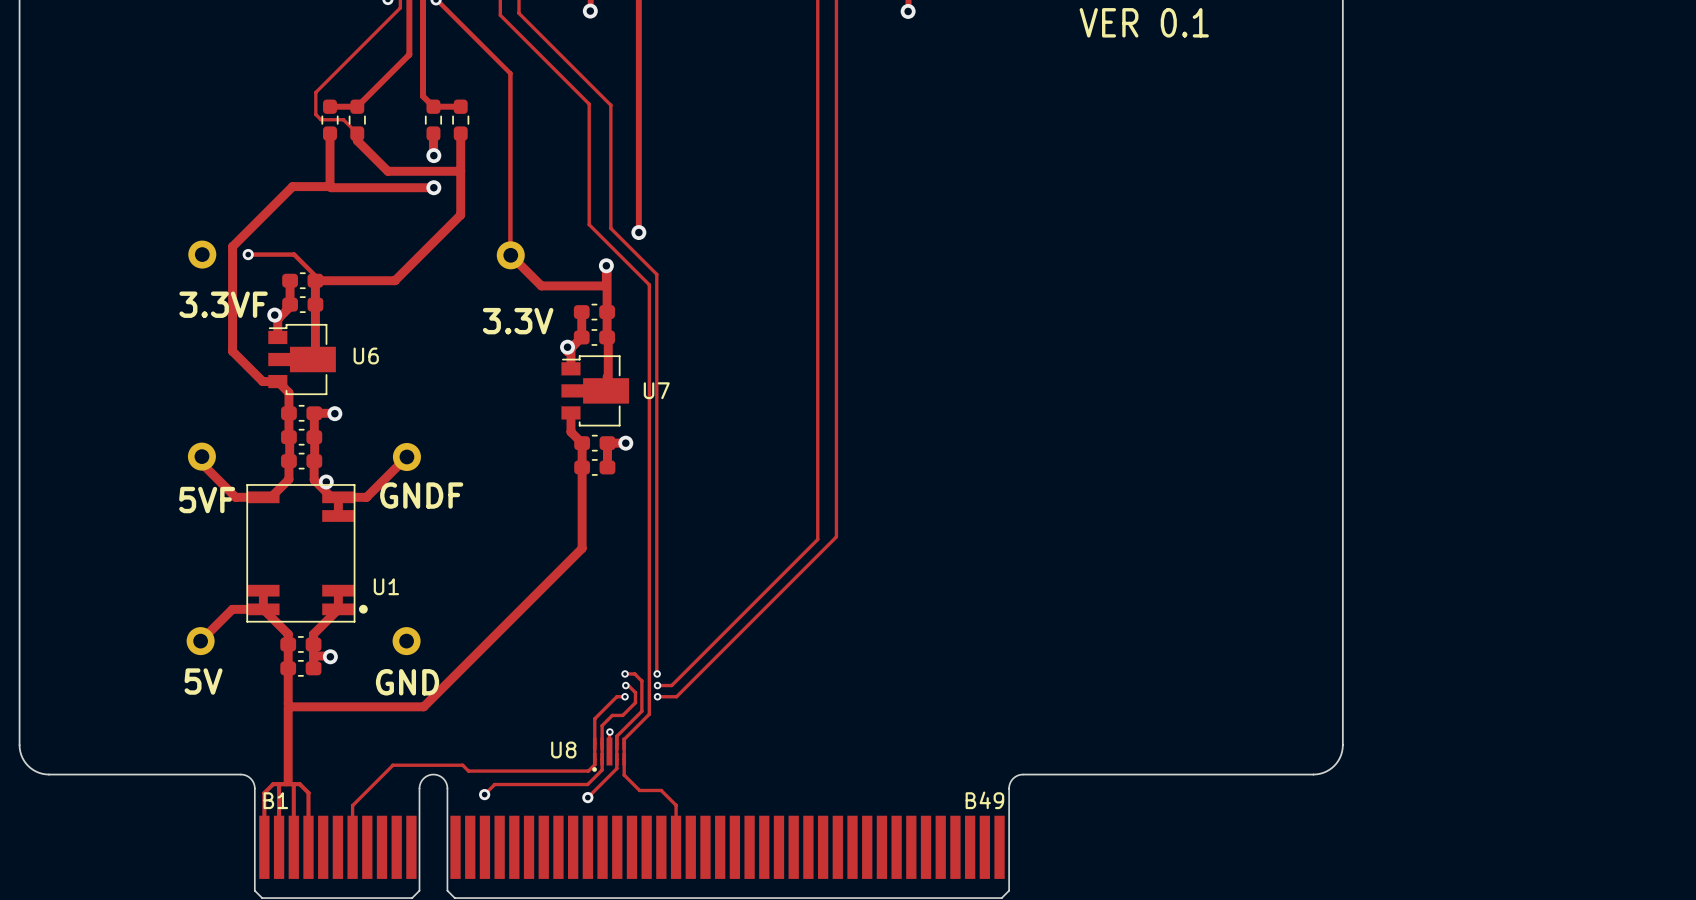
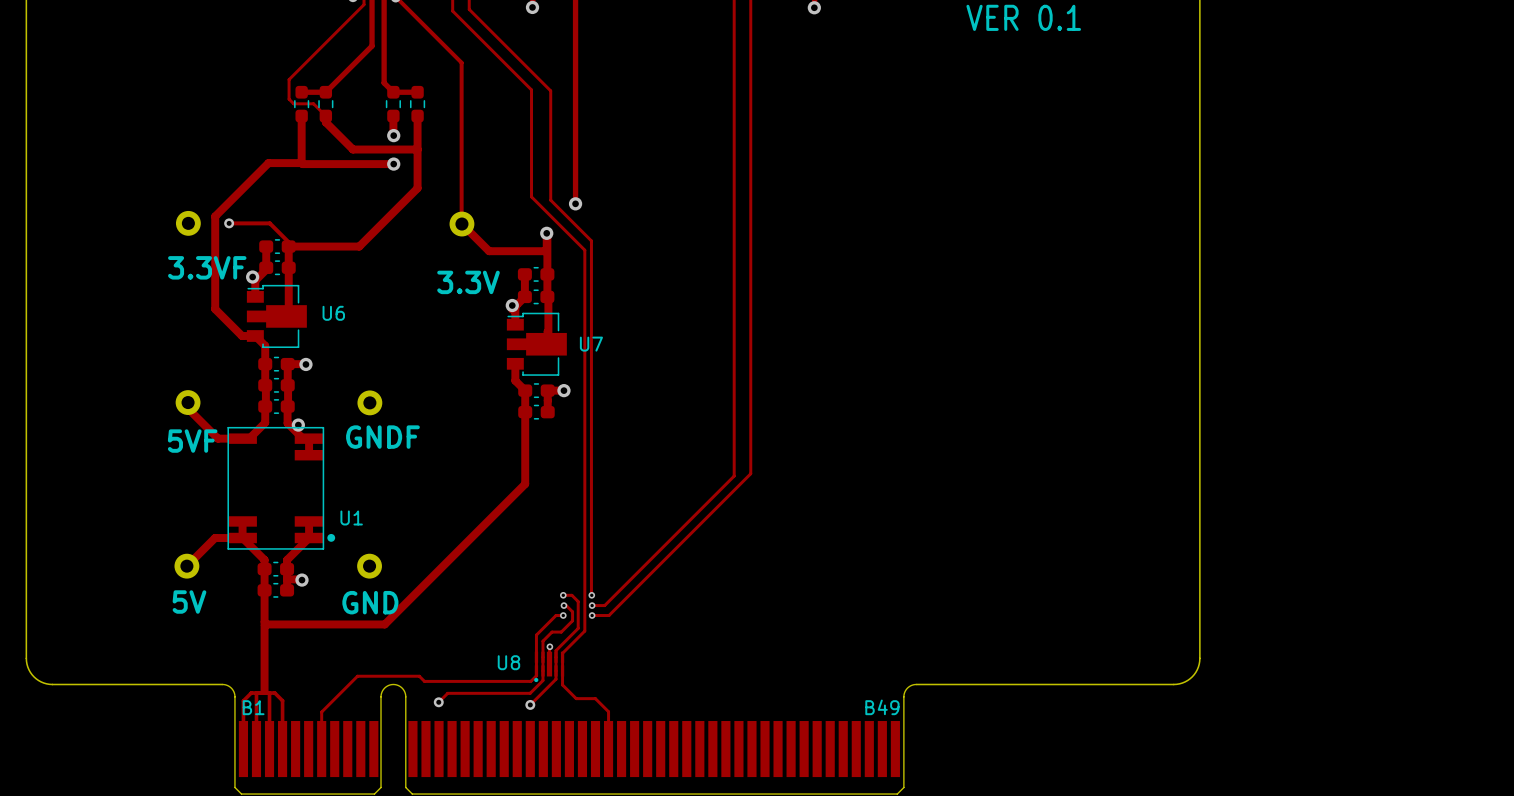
track: (406, 456) (366, 497) (338, 497) -> none

